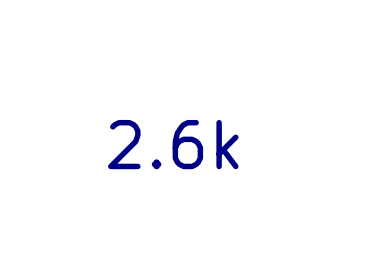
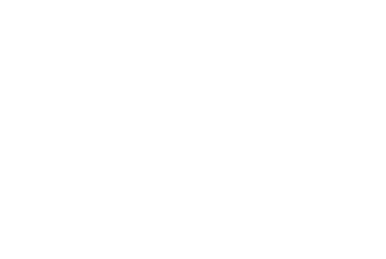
text: 2.6k (173, 144) -> none

